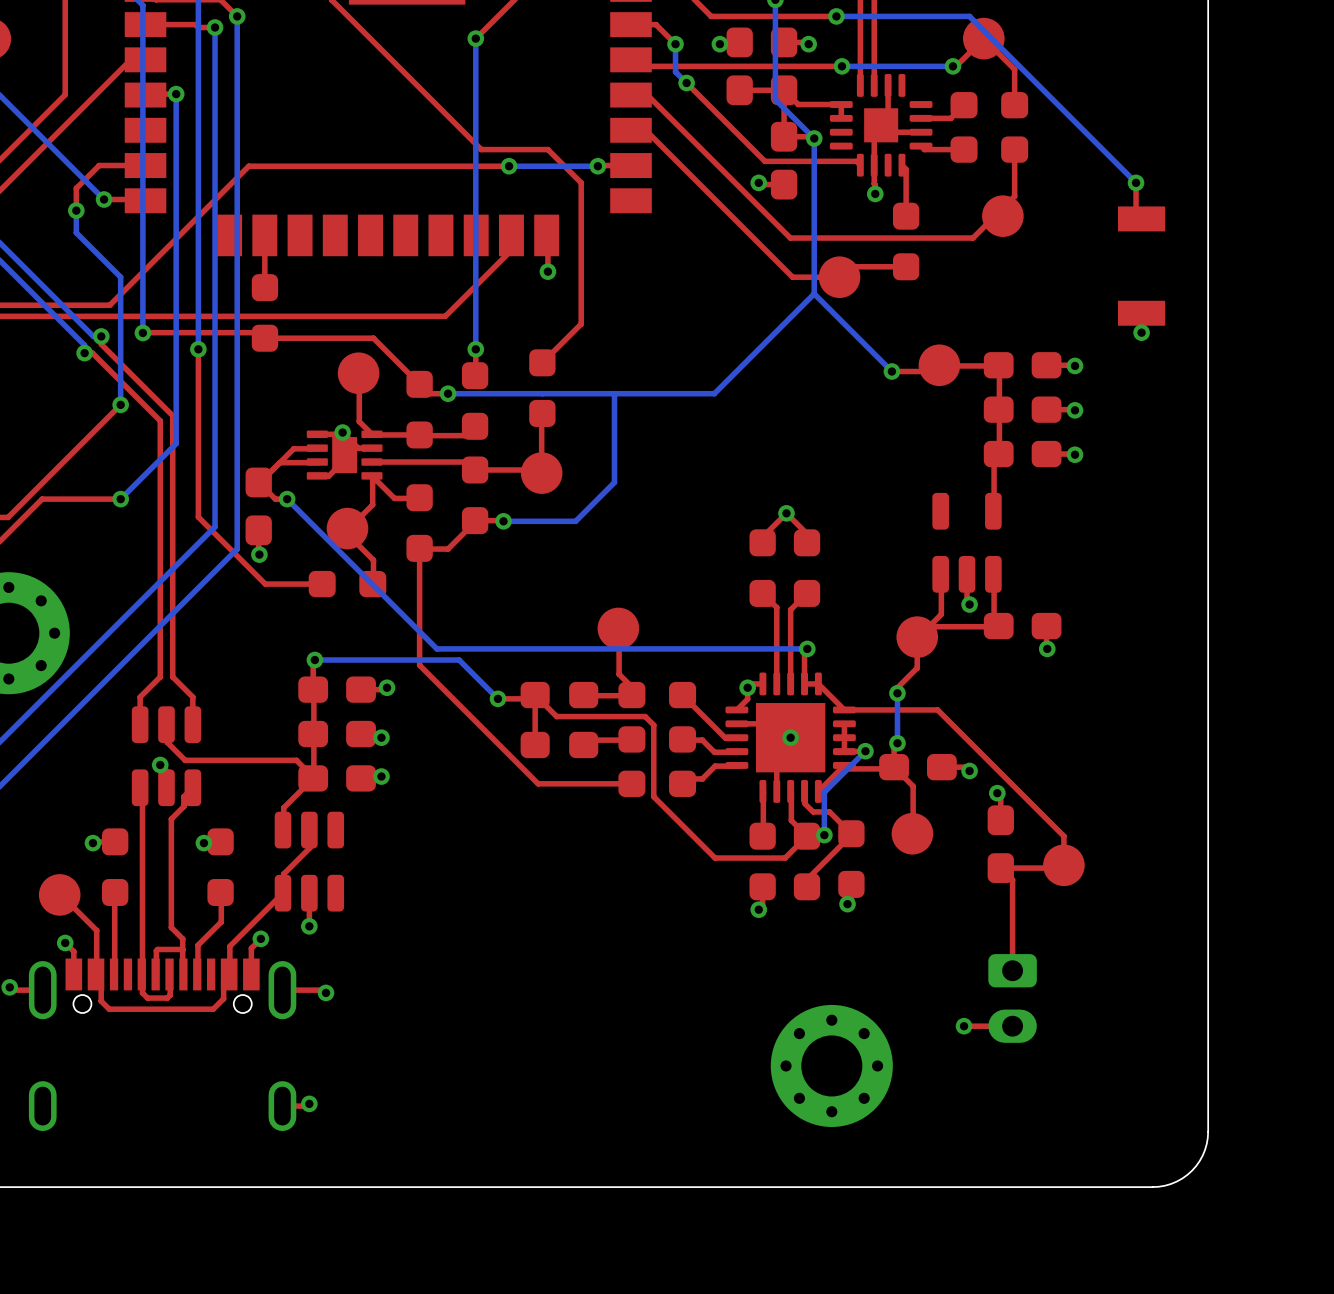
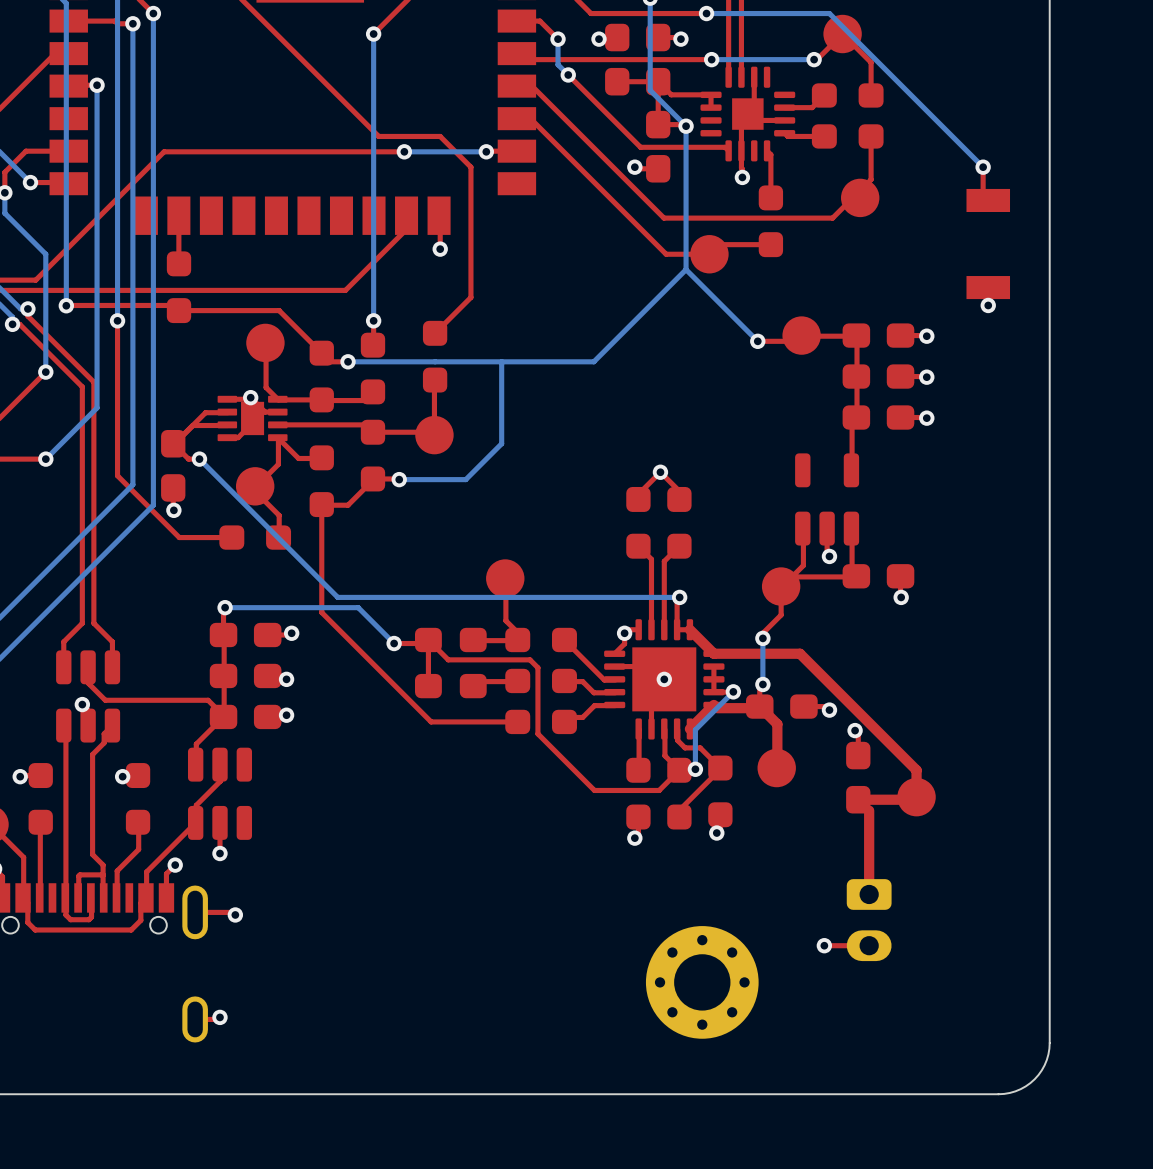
top track width: thin (818, 683) (844, 709) (937, 709) (1063, 836) (1063, 865) -> thick (689, 629) (713, 653) (800, 653) (916, 770) (916, 797)
top track width: thin (844, 765) (818, 791) -> thick (713, 704) (689, 728)
top track width: thin (894, 767) (913, 786) (913, 834) -> thick (760, 707) (777, 724) (777, 768)
top track width: thin (892, 768) (847, 768) -> thick (758, 708) (717, 708)
top track width: thin (1061, 868) (1000, 868) -> thick (913, 799) (858, 799)
top track width: thin (1012, 879) (1012, 970) -> thick (869, 810) (869, 894)

